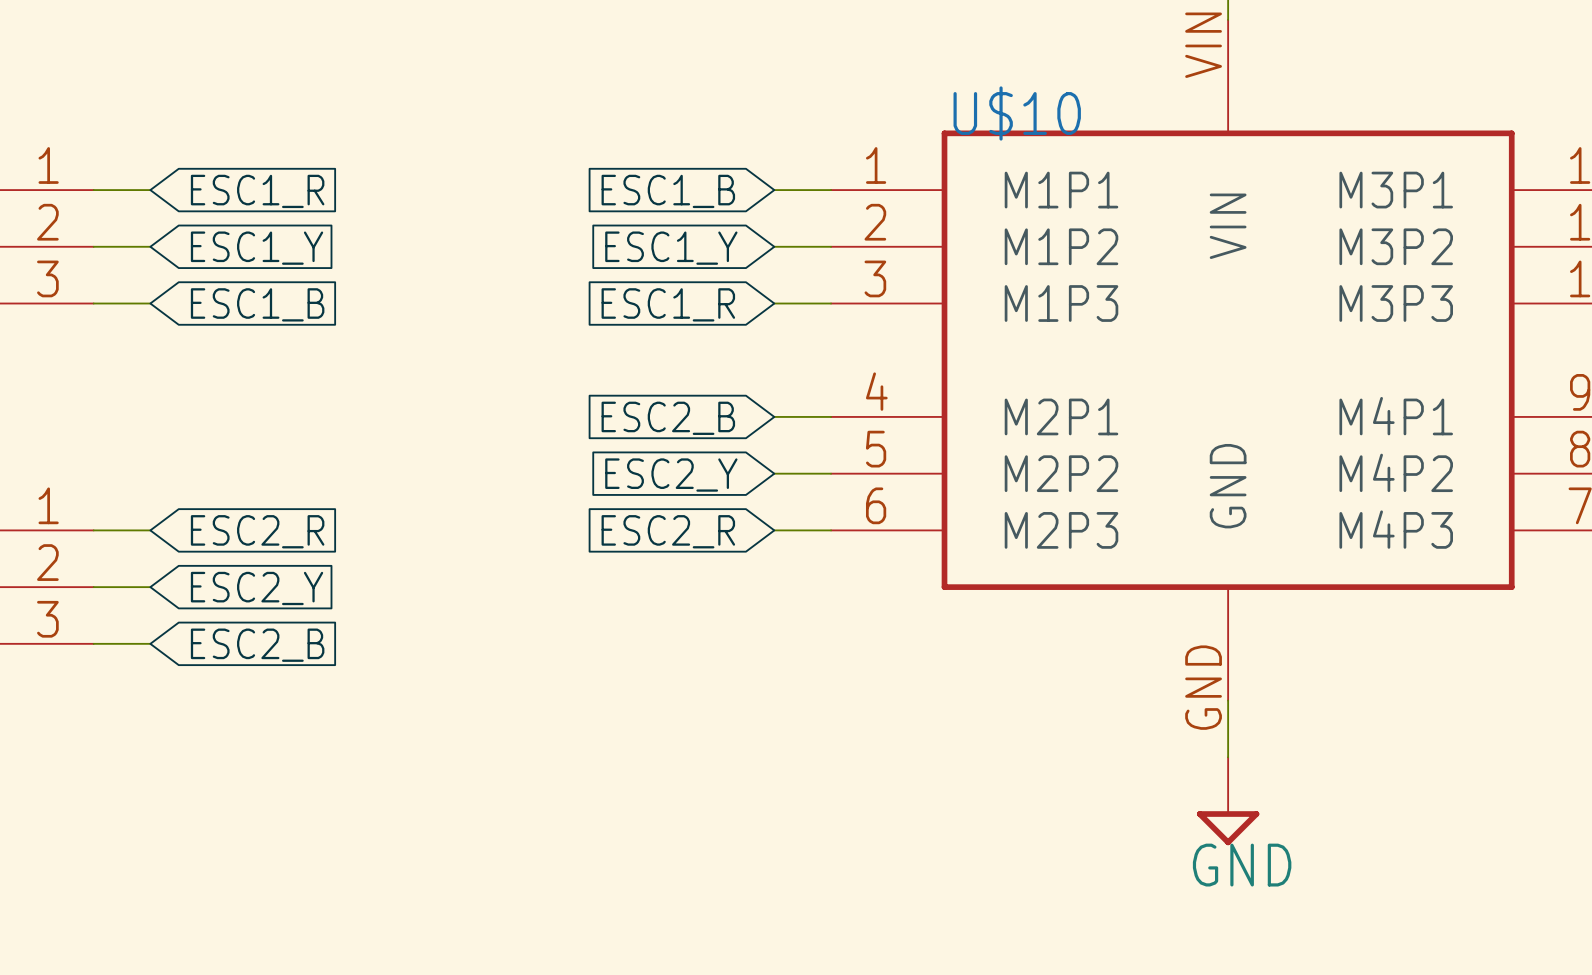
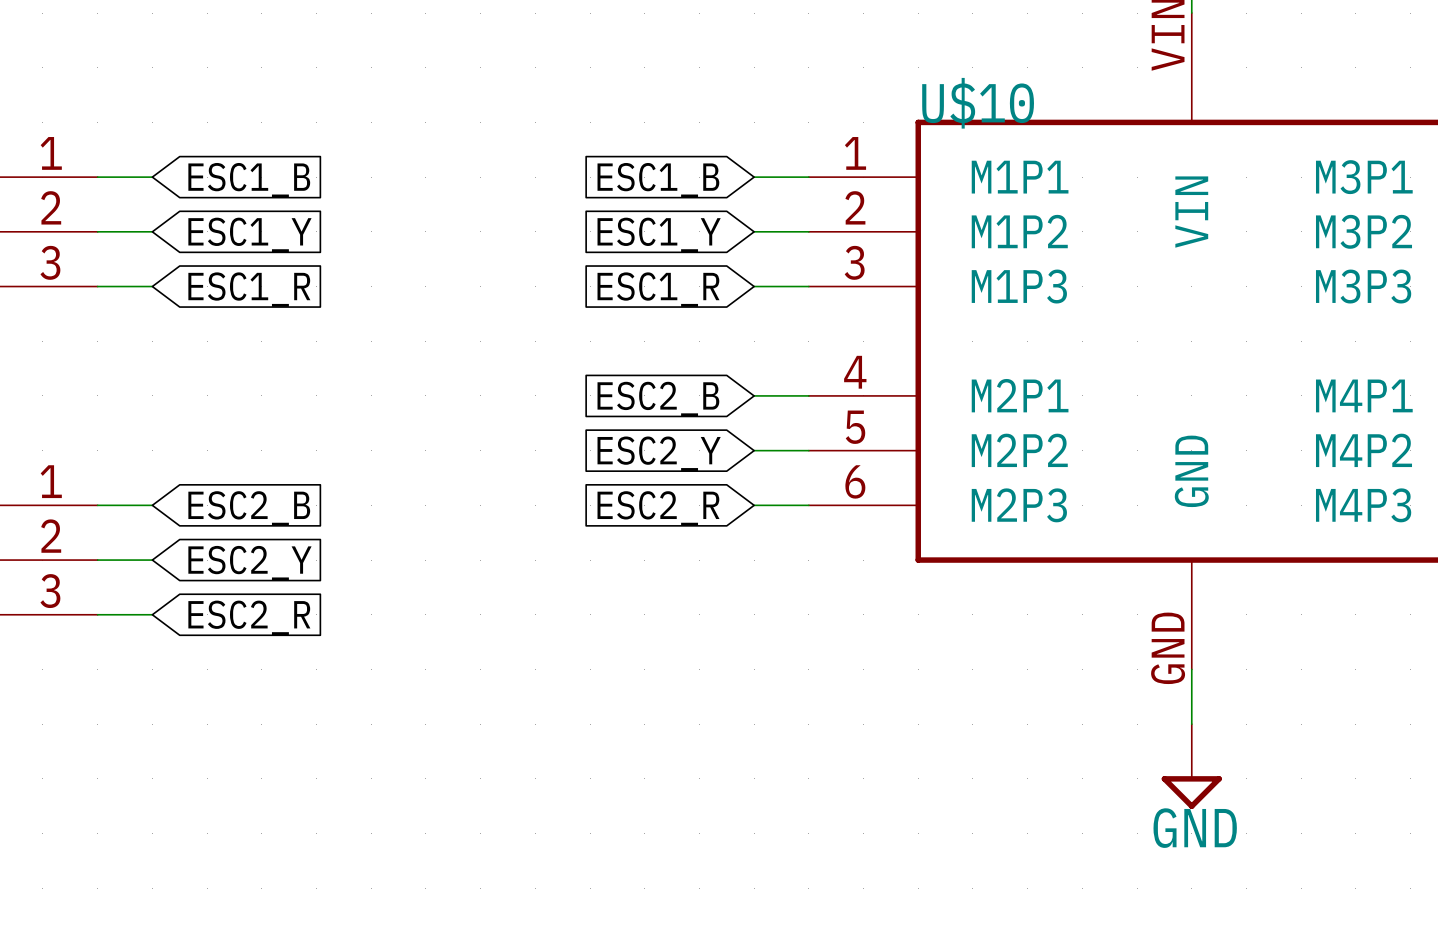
global label: ESC1_R (257, 191) -> ESC1_B (249, 180)
global label: ESC1_B (257, 304) -> ESC1_R (249, 289)
global label: ESC2_R (257, 531) -> ESC2_B (249, 508)
global label: ESC2_B (257, 645) -> ESC2_R (249, 617)

